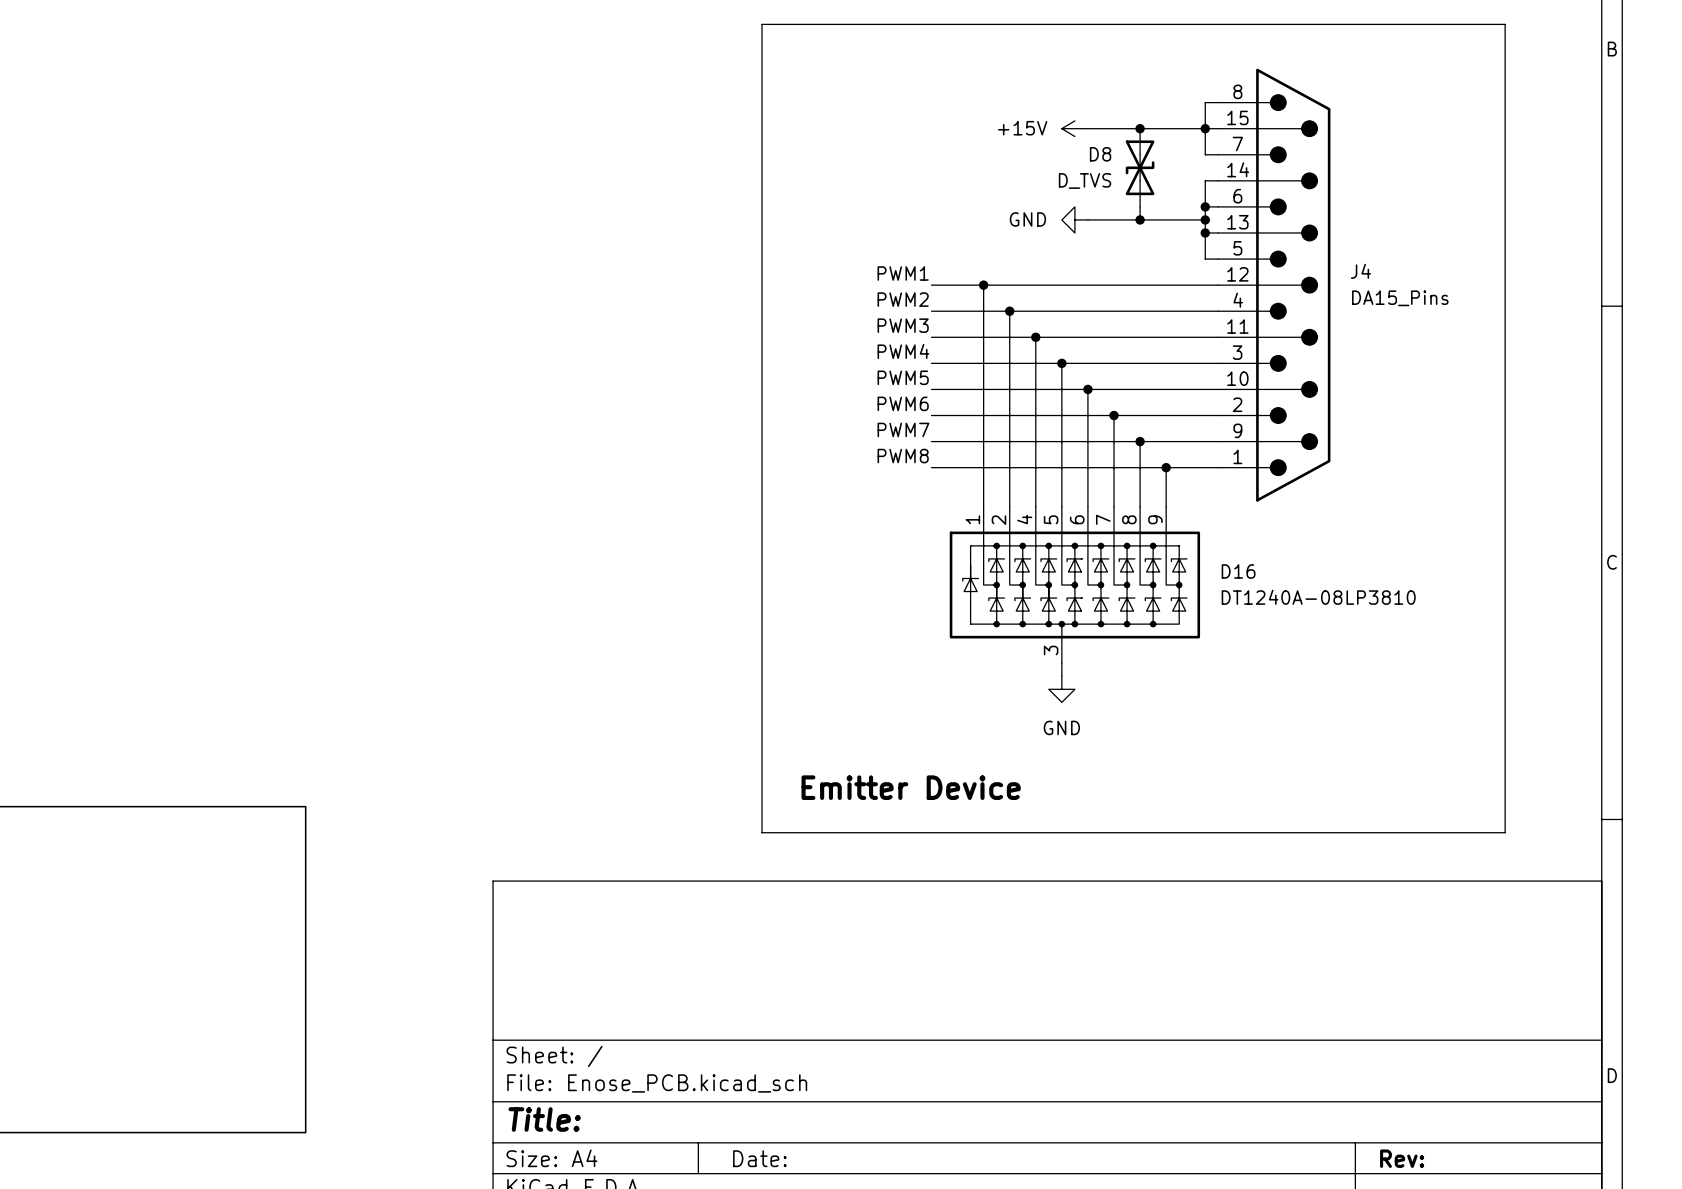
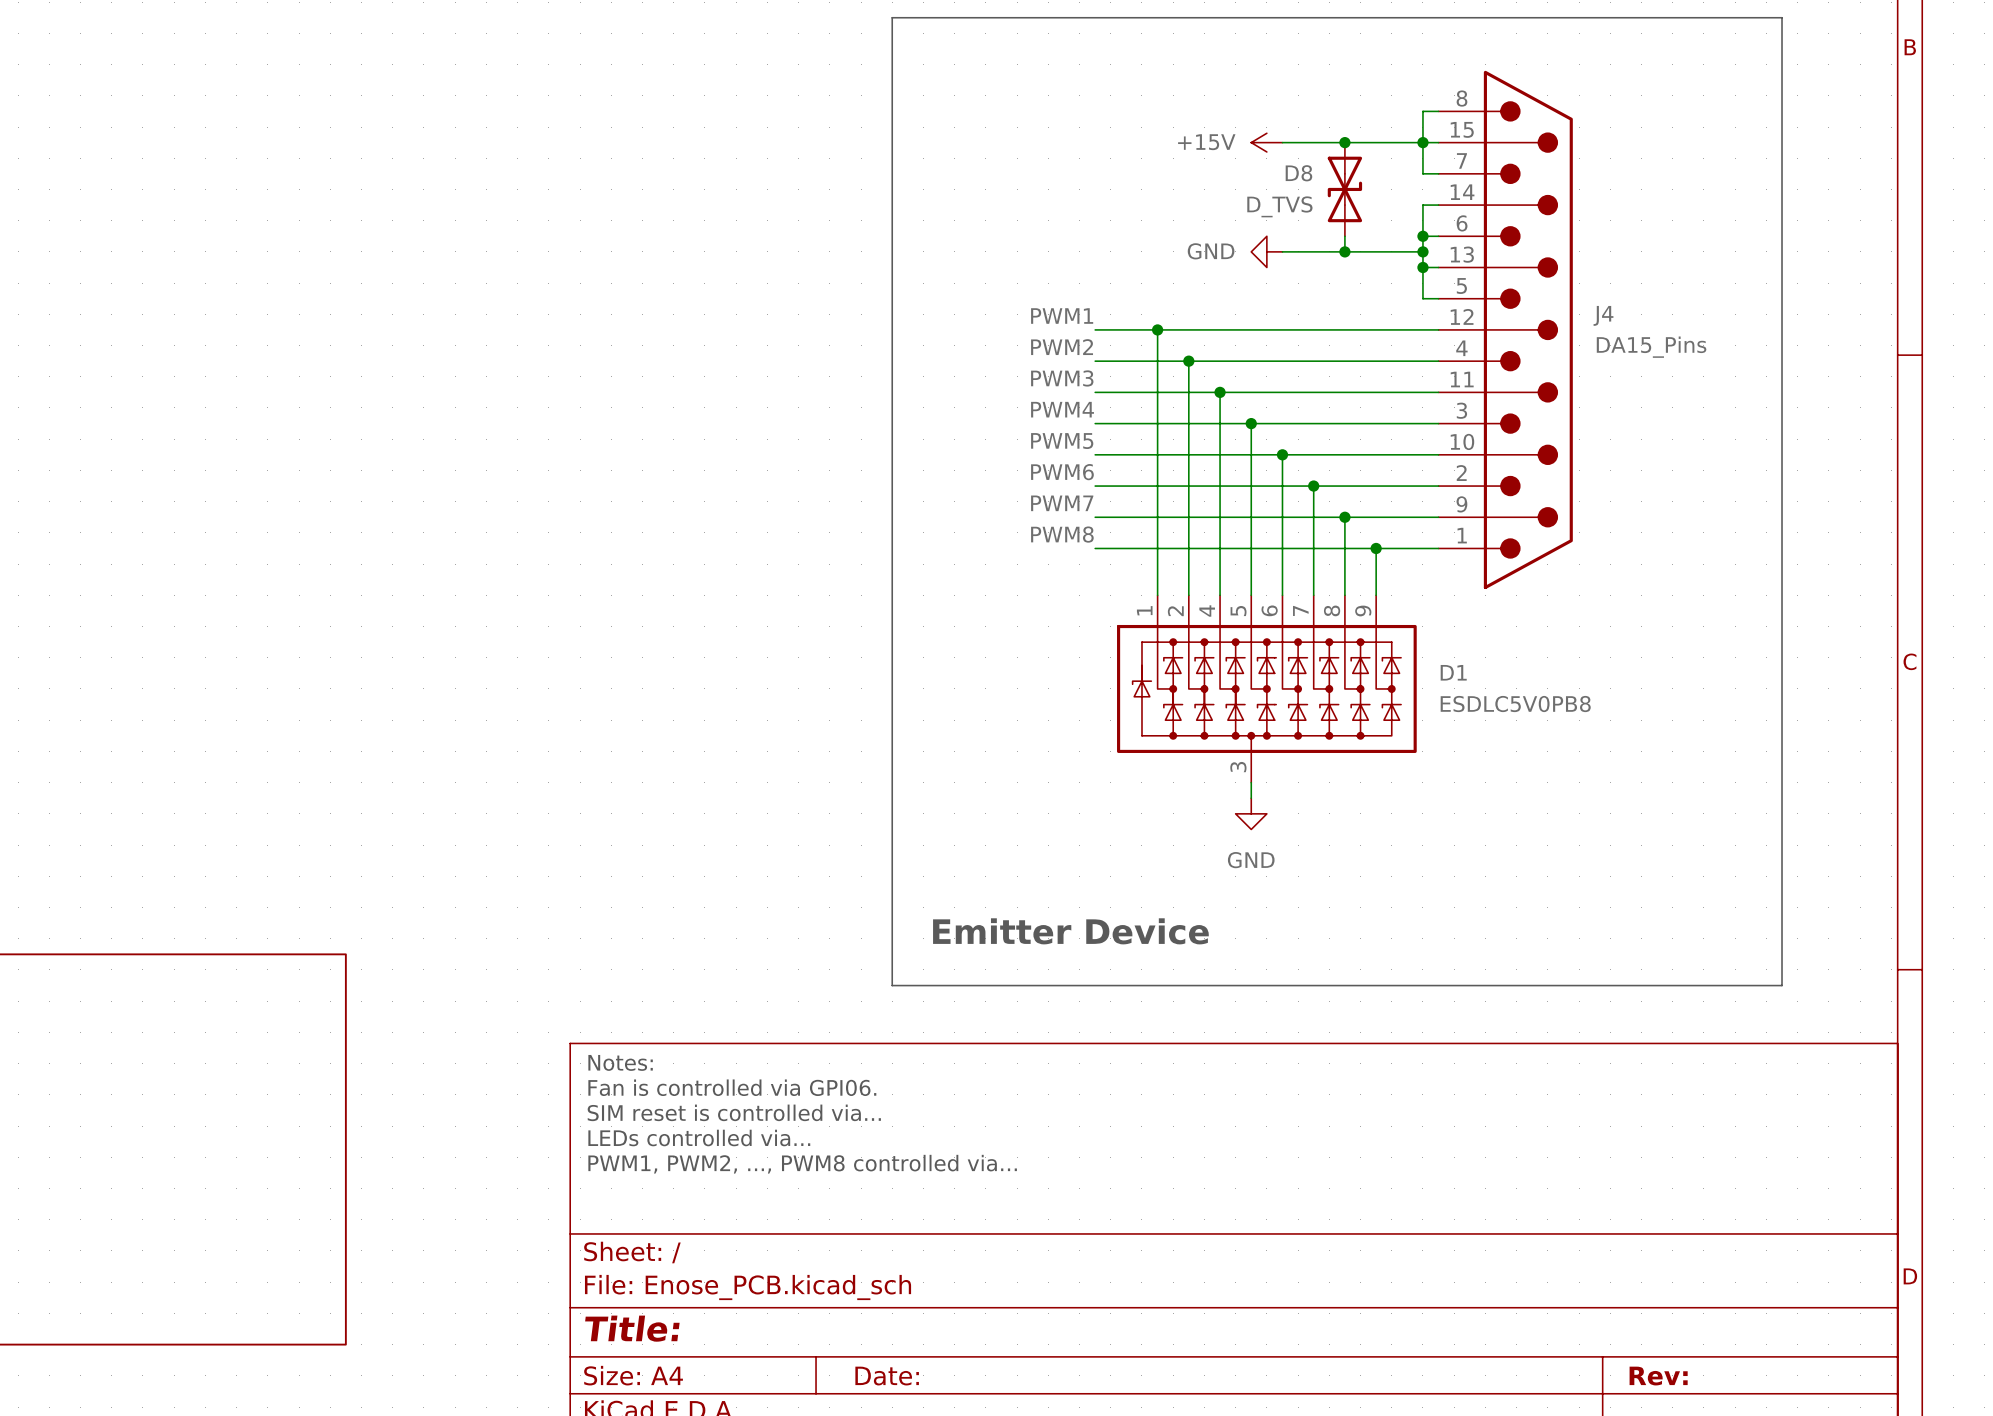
D16 name: D16 (1238, 571) -> D1 (1453, 672)
D16 value: DT1240A-08LP3810 (1318, 597) -> ESDLC5V0PB8 (1515, 704)
text: none -> Notes: (620, 1062)
text: none -> Fan is controlled via GPI06. (732, 1087)
text: none -> SIM reset is controlled via... (734, 1112)
text: none -> LEDs controlled via... (699, 1137)
text: none -> PWM1, PWM2, ..., PWM8 controlled via... (802, 1164)

